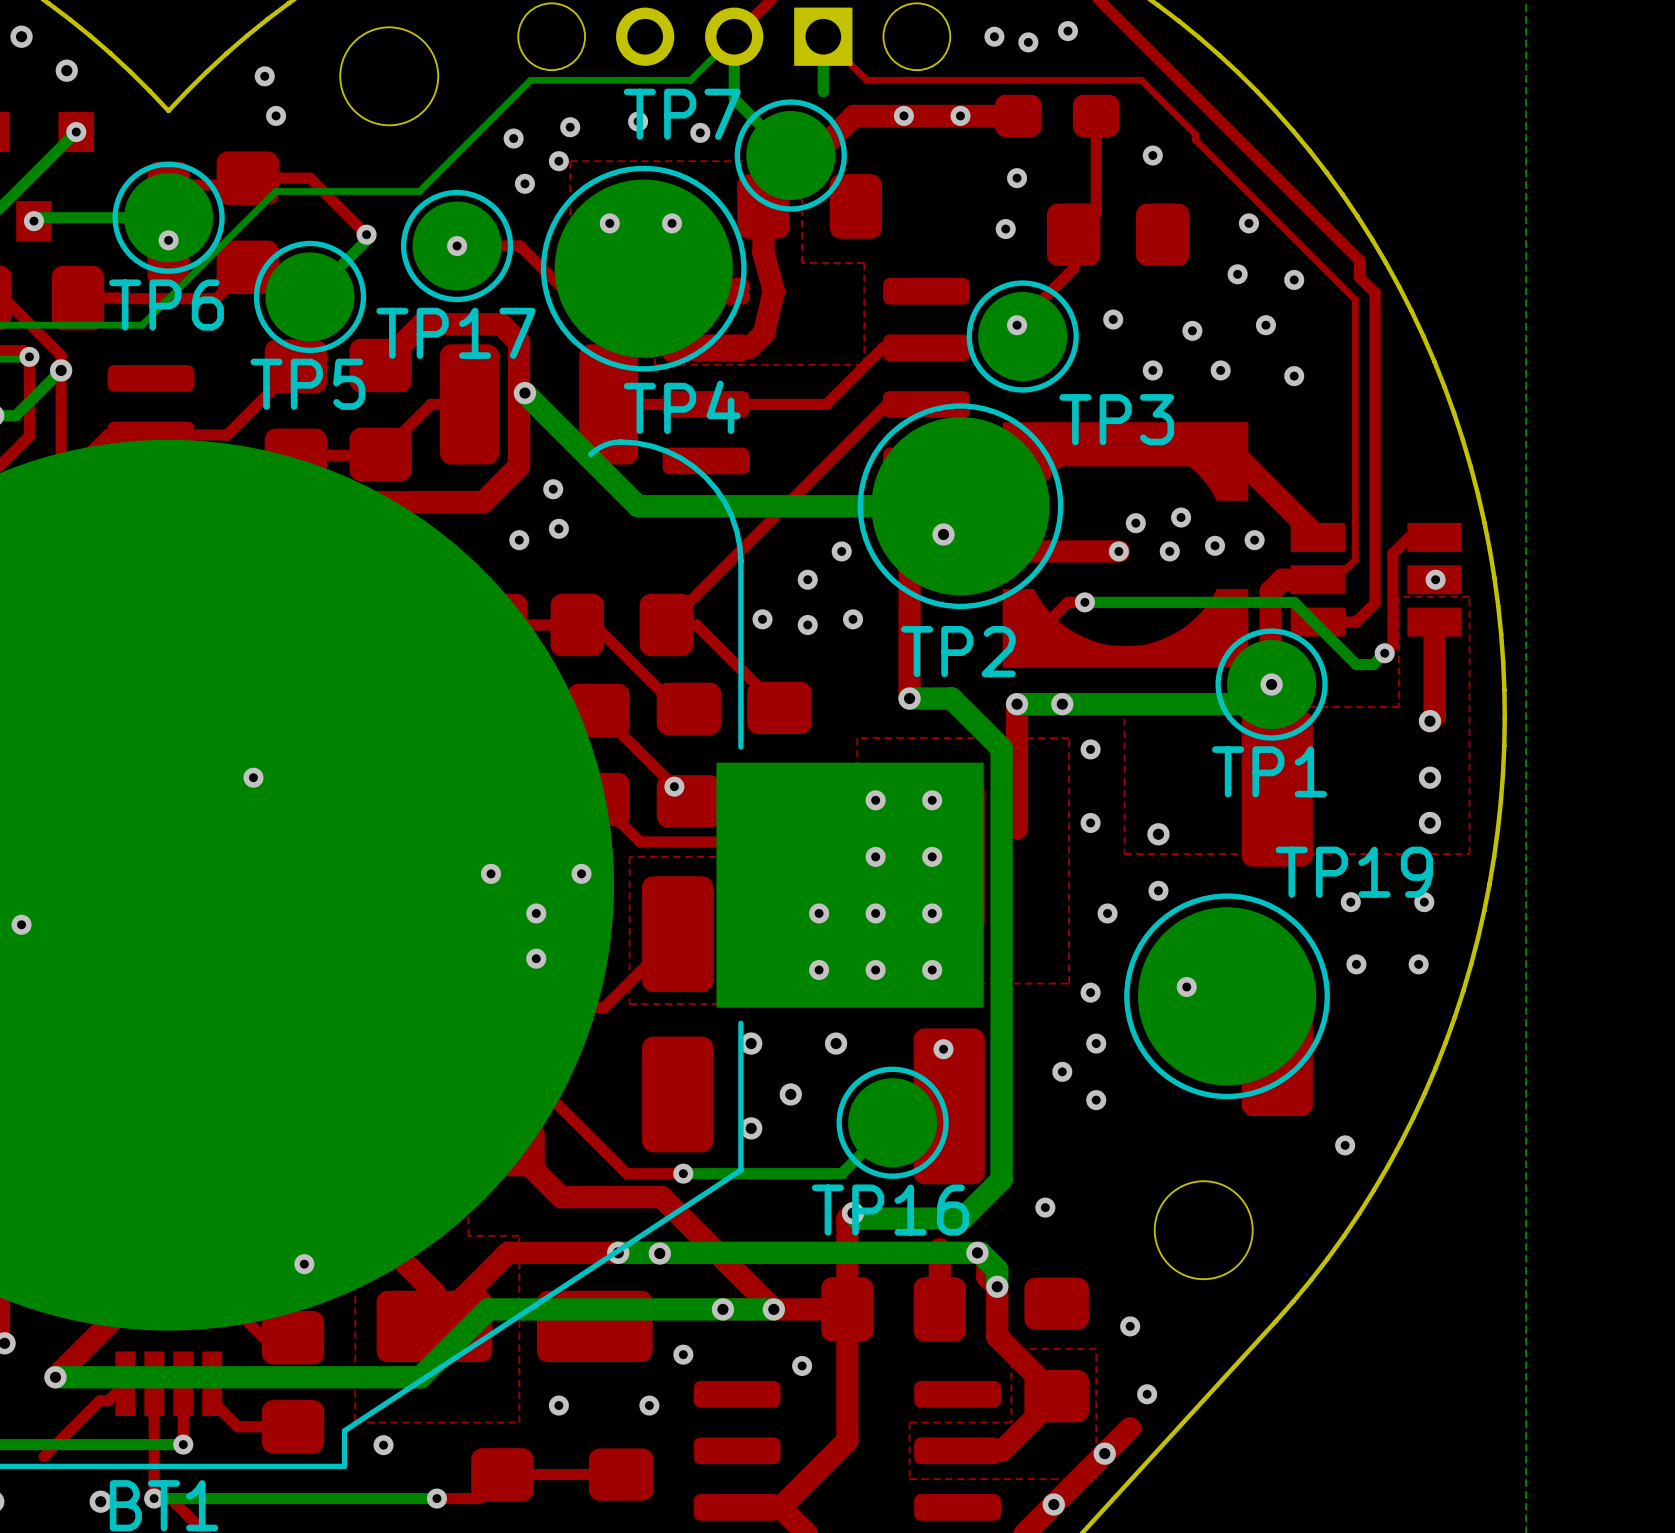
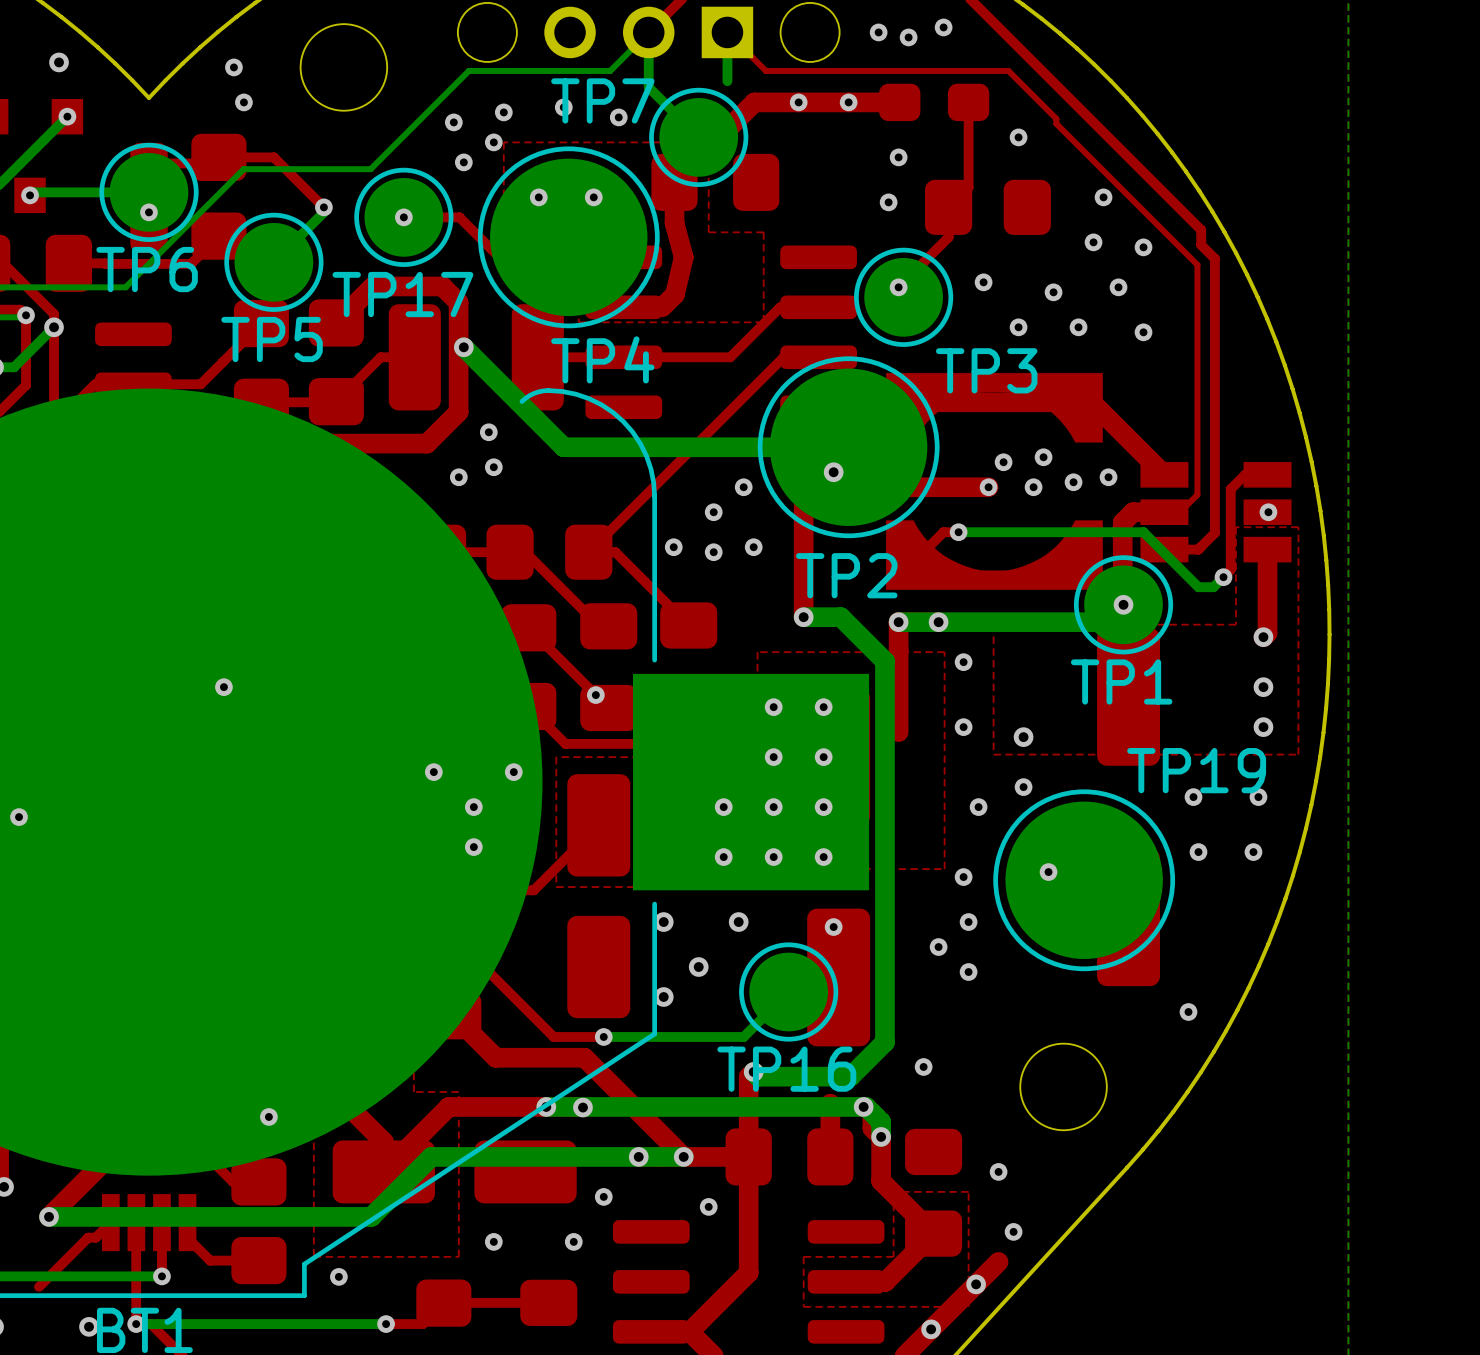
via: (21, 36) -> none

